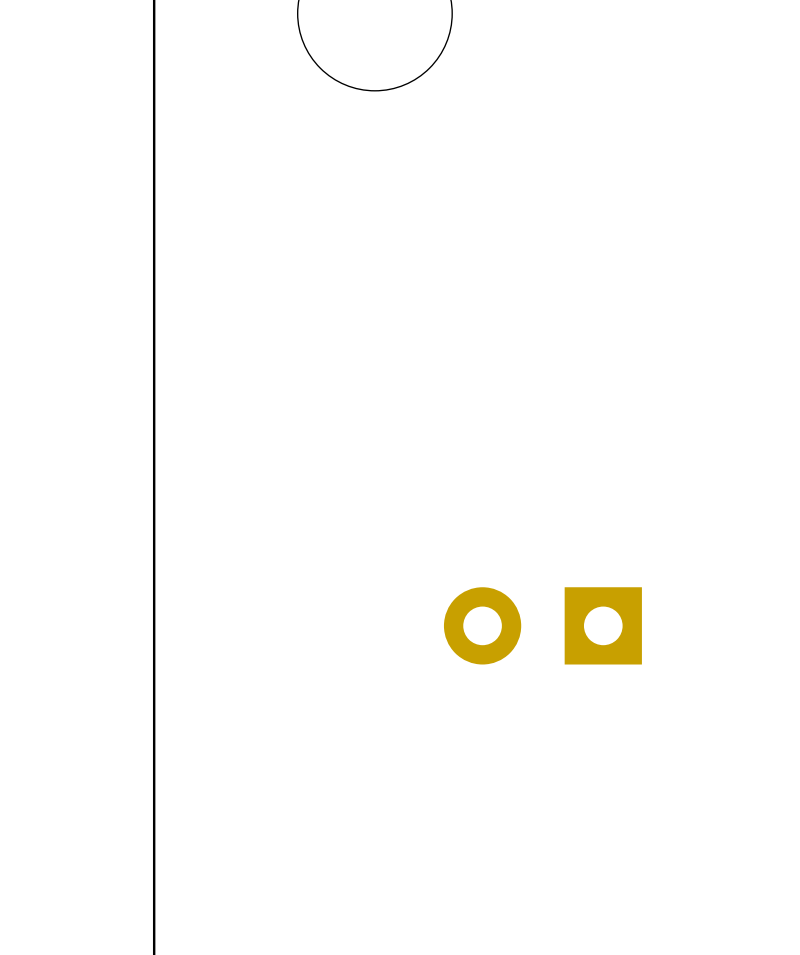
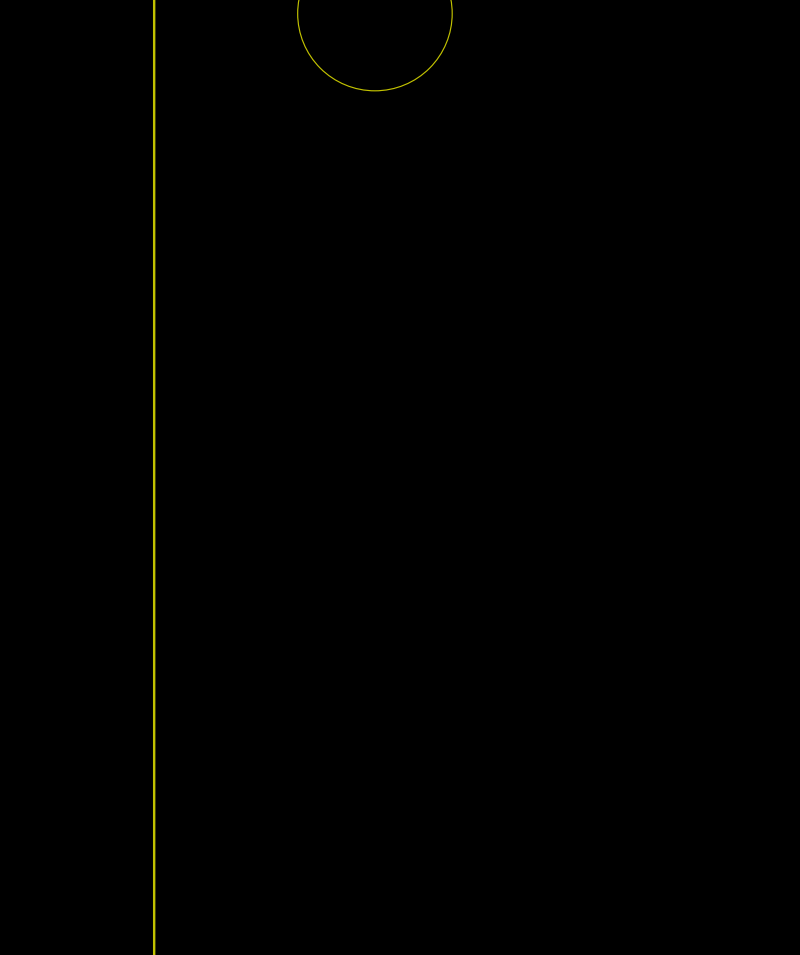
part: (542, 625) -> none

